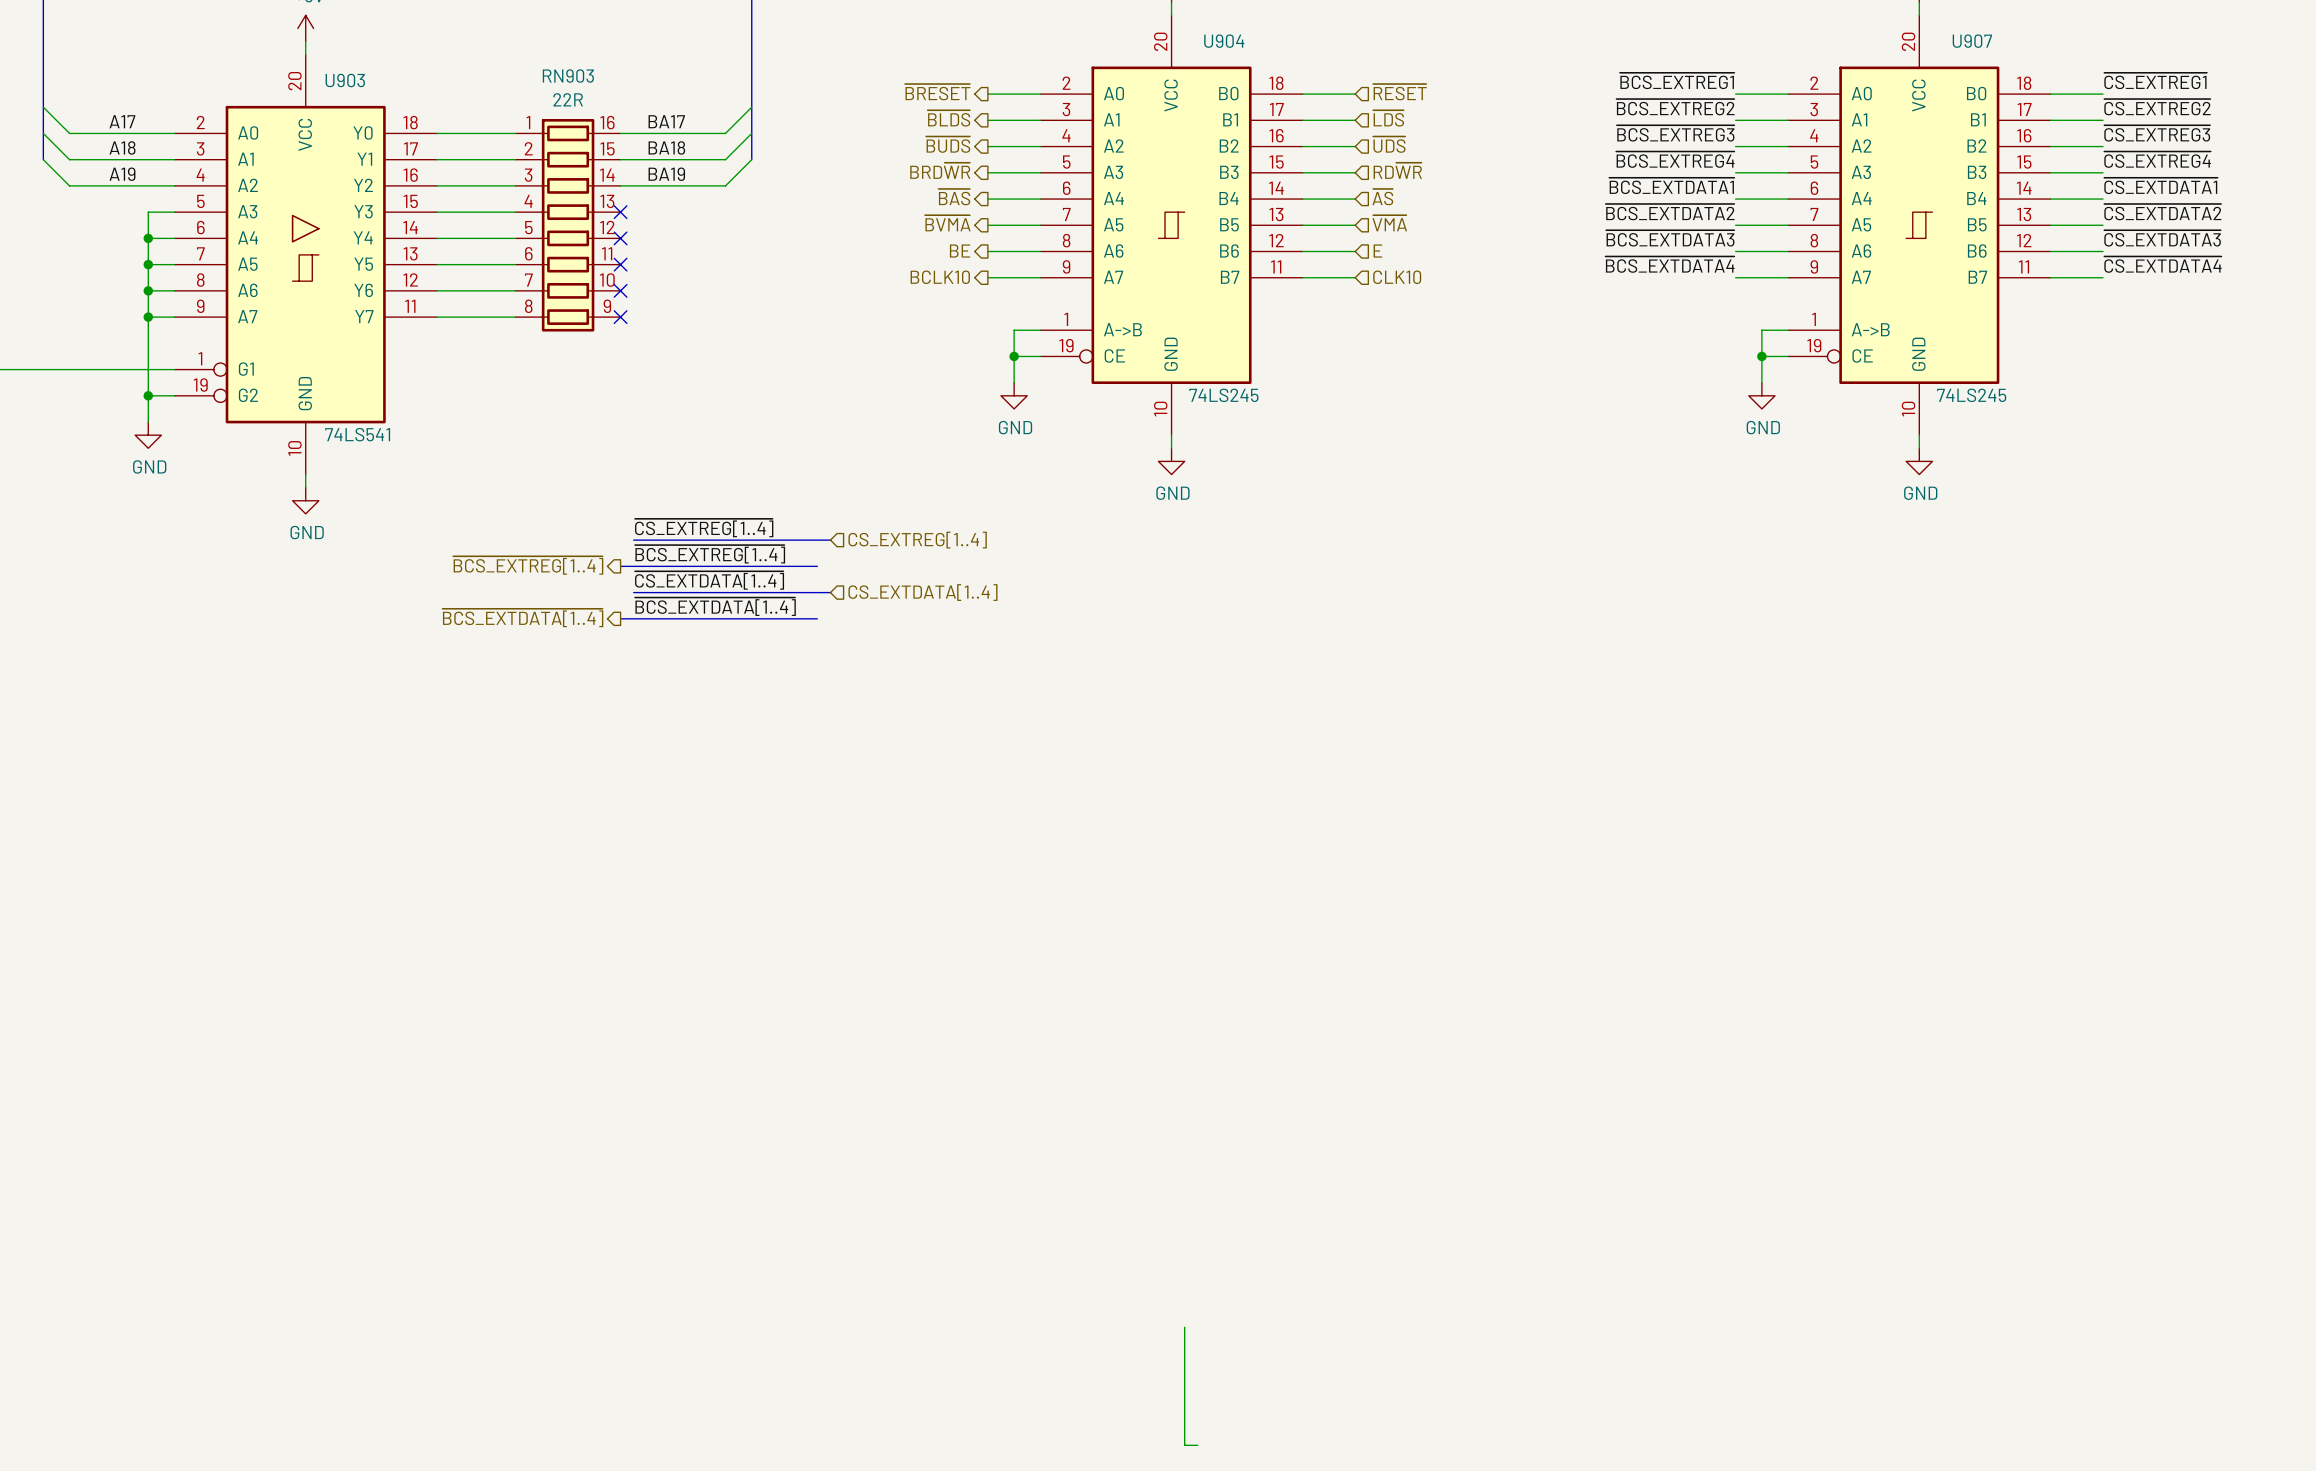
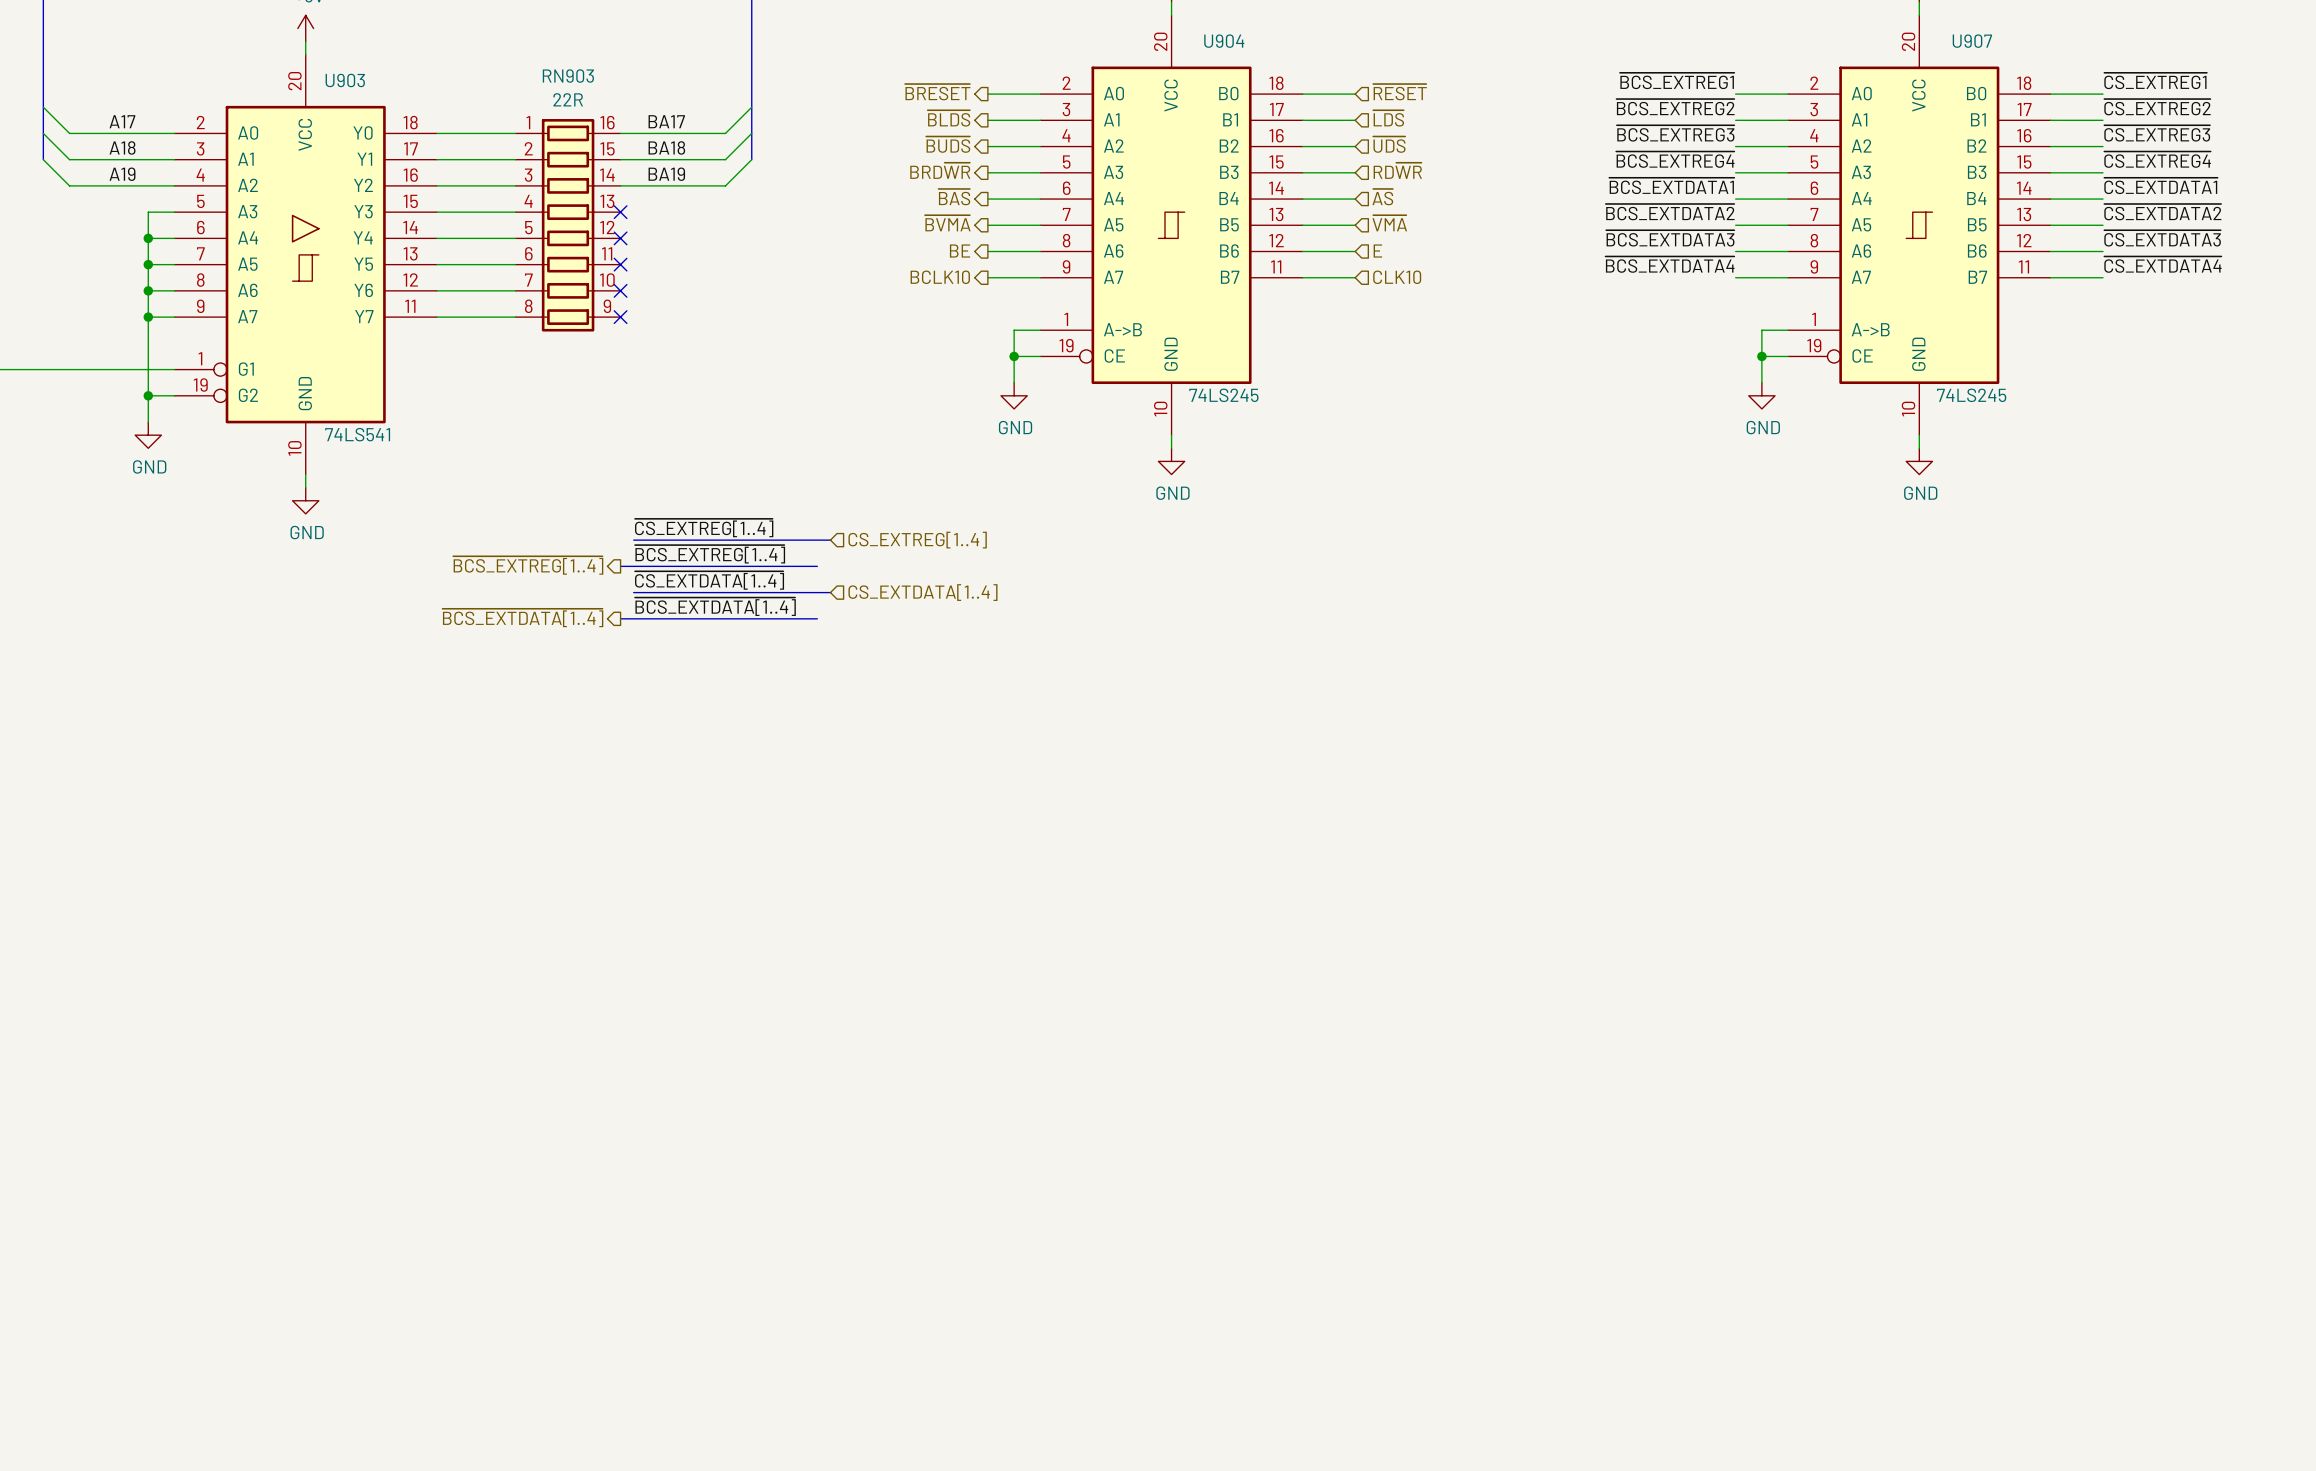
wire: (1184, 1327) (1184, 1445) (1197, 1445) -> none

